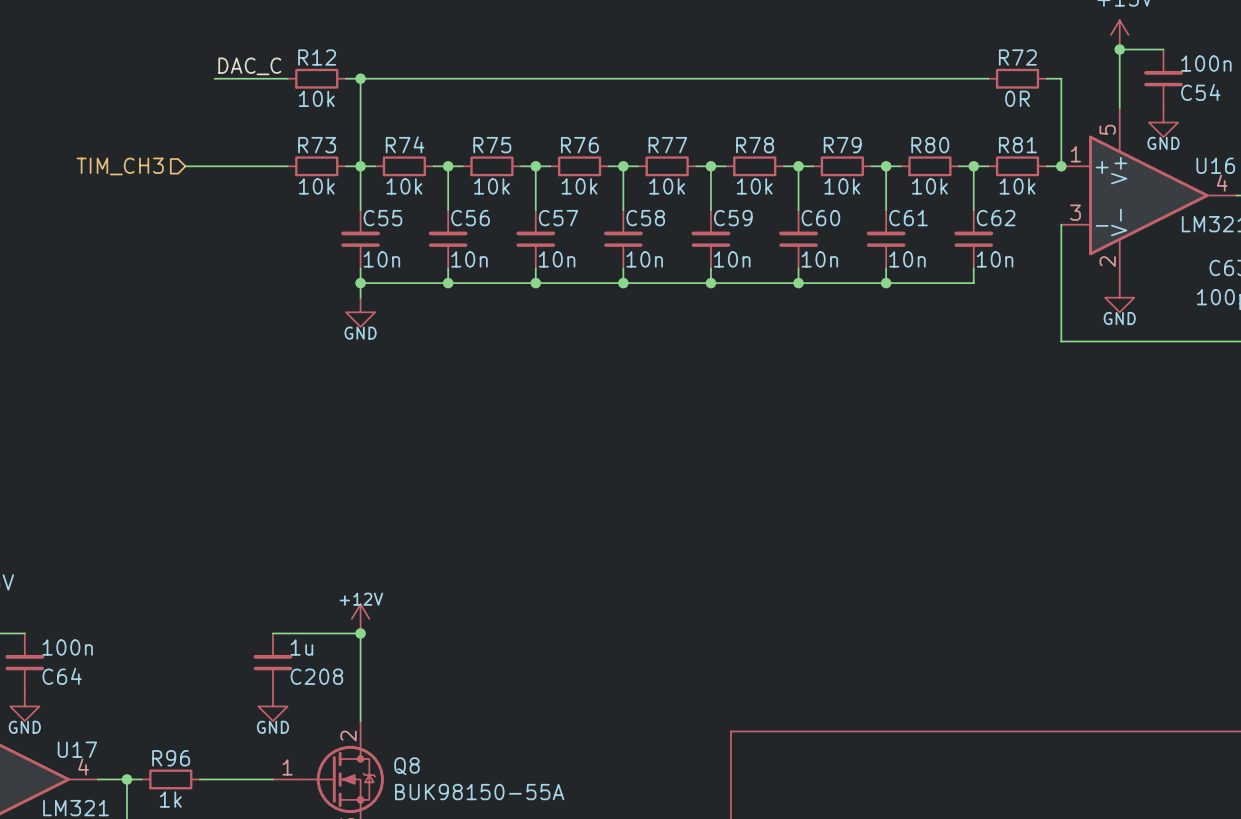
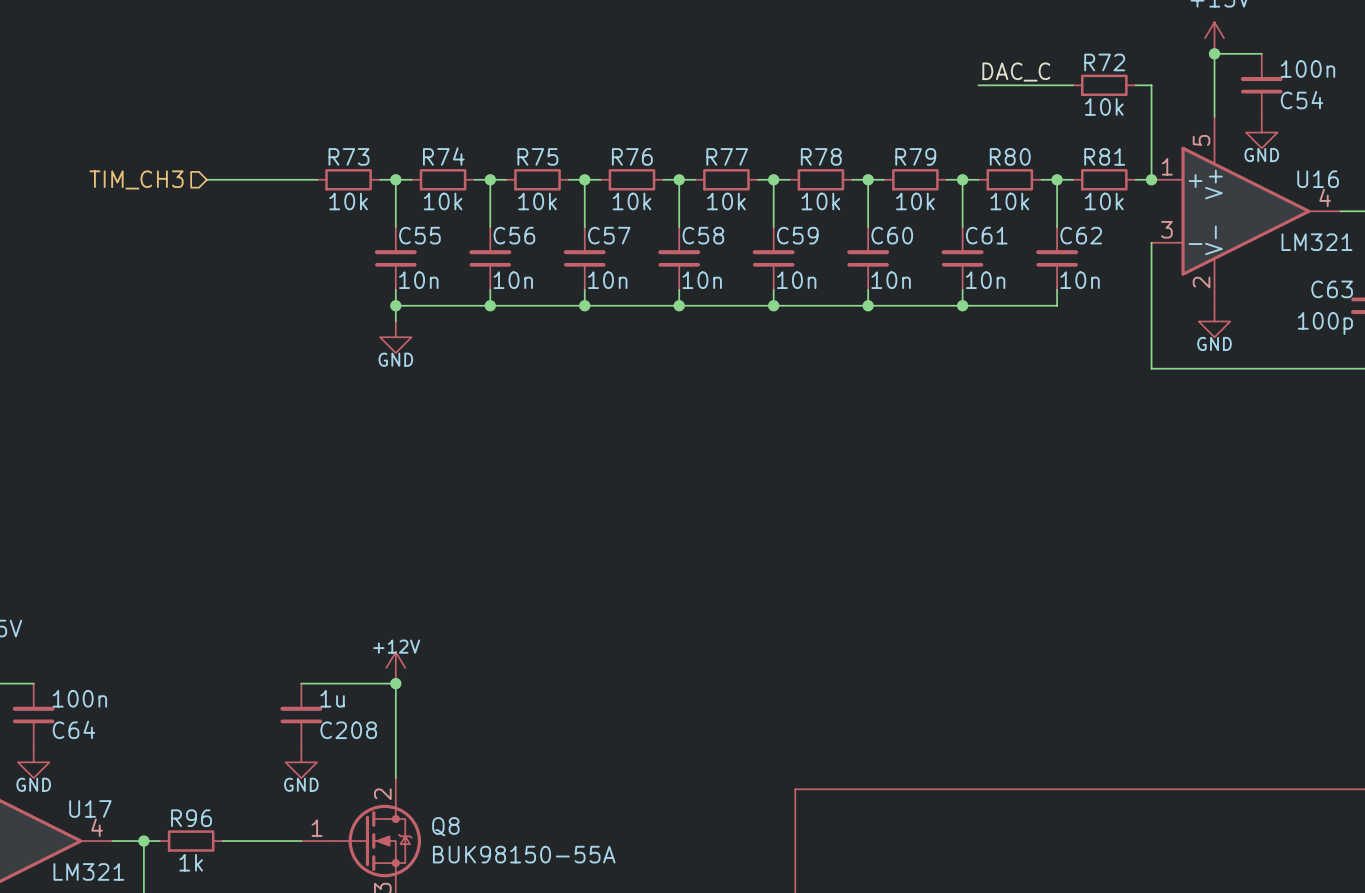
label: DAC_C (249, 66) -> none
label: none -> DAC_C (1016, 72)
wire: (214, 78) (287, 78) -> none
R12: 10k (316, 78) -> none
wire: (345, 78) (900, 78) -> none
wire: (360, 78) (360, 166) -> none
junction: (360, 78) -> none
R72 value: 0R (1017, 98) -> 10k (1104, 107)

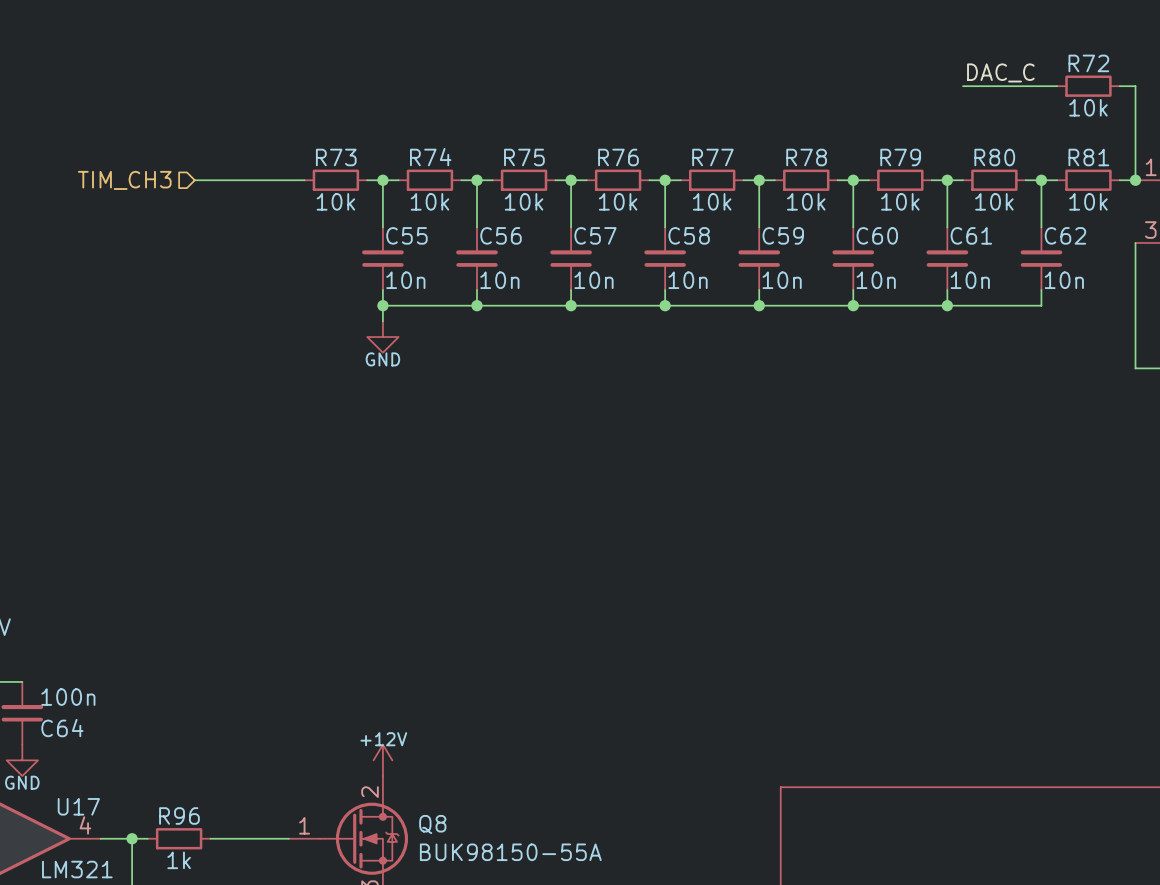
power symbol position: +12V (395, 667) -> +12V (382, 760)
wire: (301, 683) (395, 683) (395, 778) -> none
junction: (395, 683) -> none
C208: 1u (301, 715) -> none
power symbol: GND (301, 762) -> none

